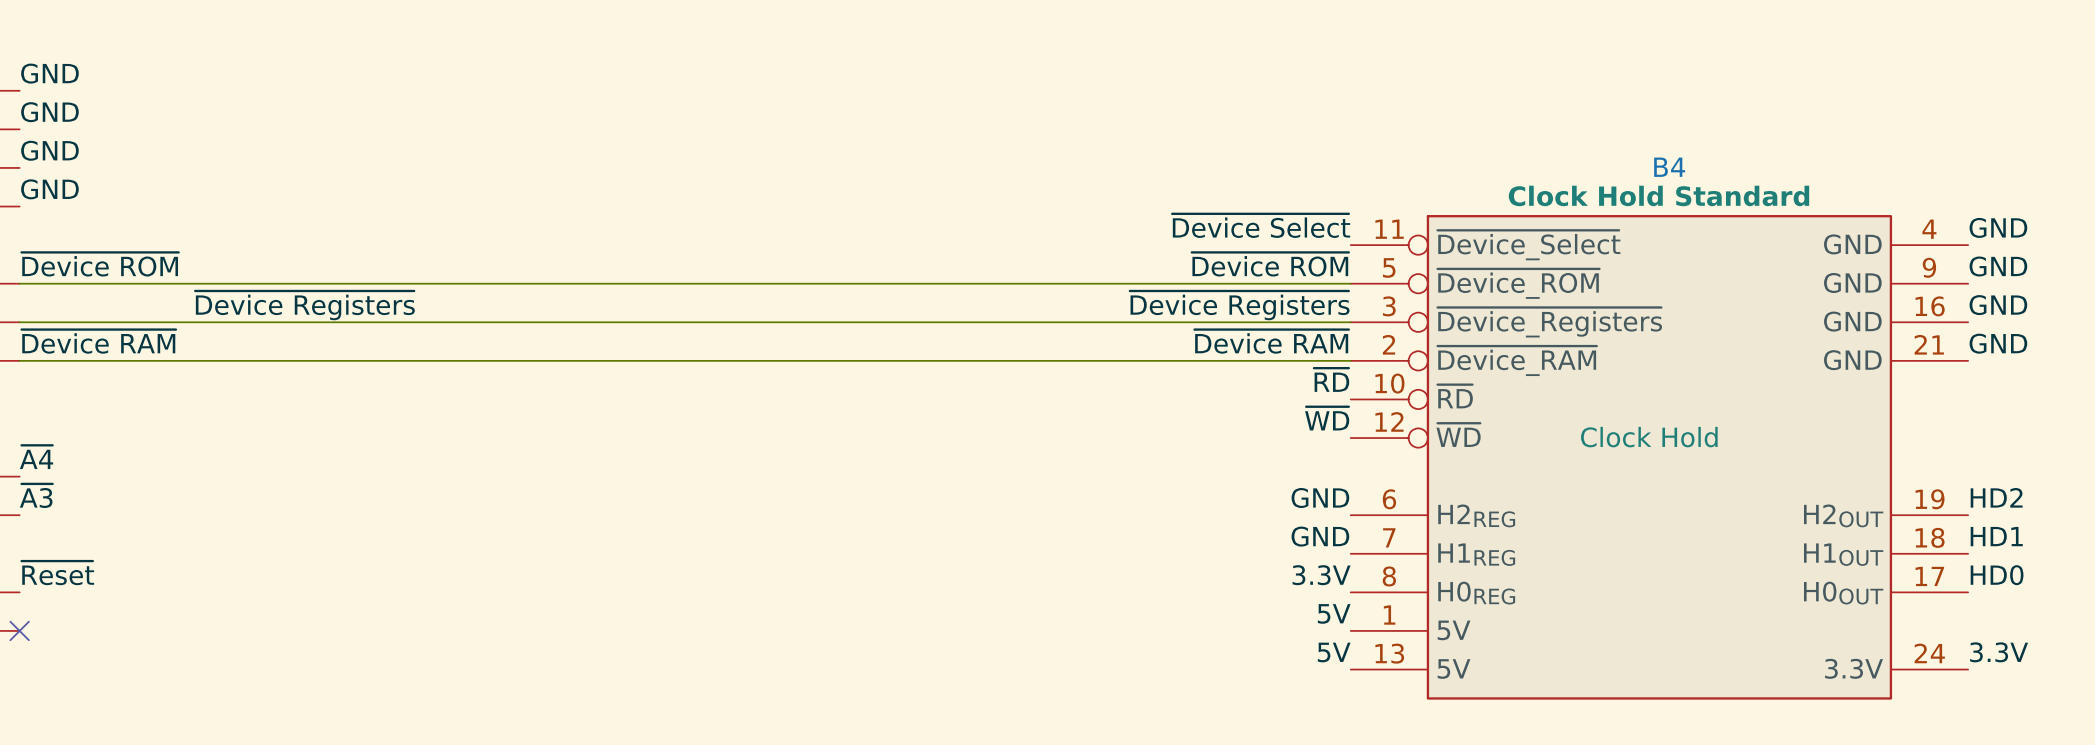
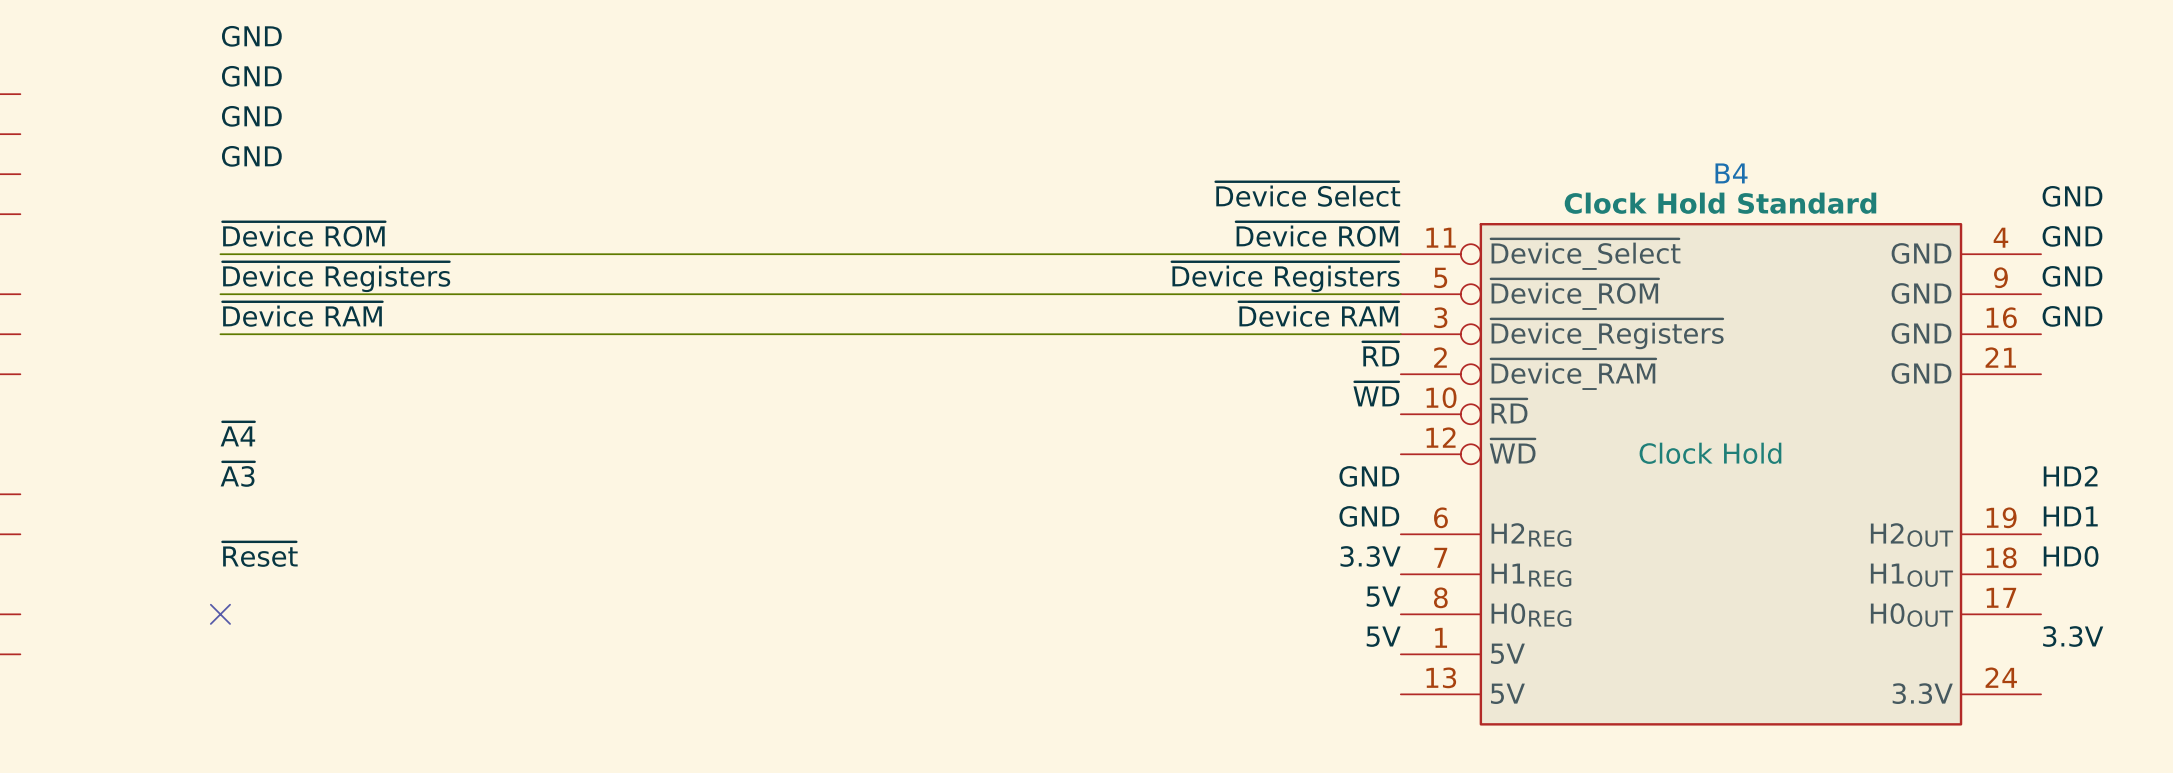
label: none -> GND (251, 36)
label: GND (49, 73) -> none
label: none -> GND (251, 76)
label: GND (49, 112) -> none
label: none -> GND (251, 116)
label: GND (49, 150) -> none
label: none -> GND (251, 156)
label: none -> ~{Device Select} (1307, 194)
label: GND (49, 189) -> none
label: ~{Device Select} (1261, 225) -> ~{Device ROM} (1317, 234)
wire: none -> (220, 254) (1400, 254)
label position: ~{Device ROM} (100, 264) -> ~{Device ROM} (303, 234)
label: ~{Device ROM} (1270, 264) -> ~{Device Registers} (1285, 276)
wire: (19, 283) (212, 283) -> none
label position: ~{Device Registers} (305, 305) -> ~{Device Registers} (336, 276)
label: ~{Device Registers} (1239, 305) -> ~{Device RAM} (1318, 314)
wire: (19, 322) (212, 322) -> none
label position: ~{Device RAM} (98, 341) -> ~{Device RAM} (302, 314)
label: ~{Device RAM} (1271, 341) -> ~{RD} (1380, 354)
label position: GND (1998, 343) -> GND (2072, 196)
wire: (19, 360) (1350, 360) -> none
label: ~{RD} (1331, 380) -> ~{WD} (1376, 394)
label: ~{WD} (1327, 418) -> none
label position: ~{A4} (36, 457) -> ~{A4} (237, 434)
label: none -> GND (1369, 476)
label: none -> HD2 (2070, 476)
label position: ~{A3} (36, 495) -> ~{A3} (237, 474)
label: HD2 (1996, 497) -> HD1 (2070, 516)
label: GND (1320, 536) -> 3.3V (1370, 556)
label: HD1 (1996, 536) -> HD0 (2071, 556)
label position: ~{Reset} (57, 573) -> ~{Reset} (260, 554)
label: 3.3V (1321, 575) -> 5V (1383, 596)
label: HD0 (1997, 575) -> none
no-connect mark: none -> (220, 614)
no-connect mark: (19, 630) -> none
label: 5V (1334, 652) -> none
label position: 3.3V (1999, 652) -> 3.3V (2073, 636)

